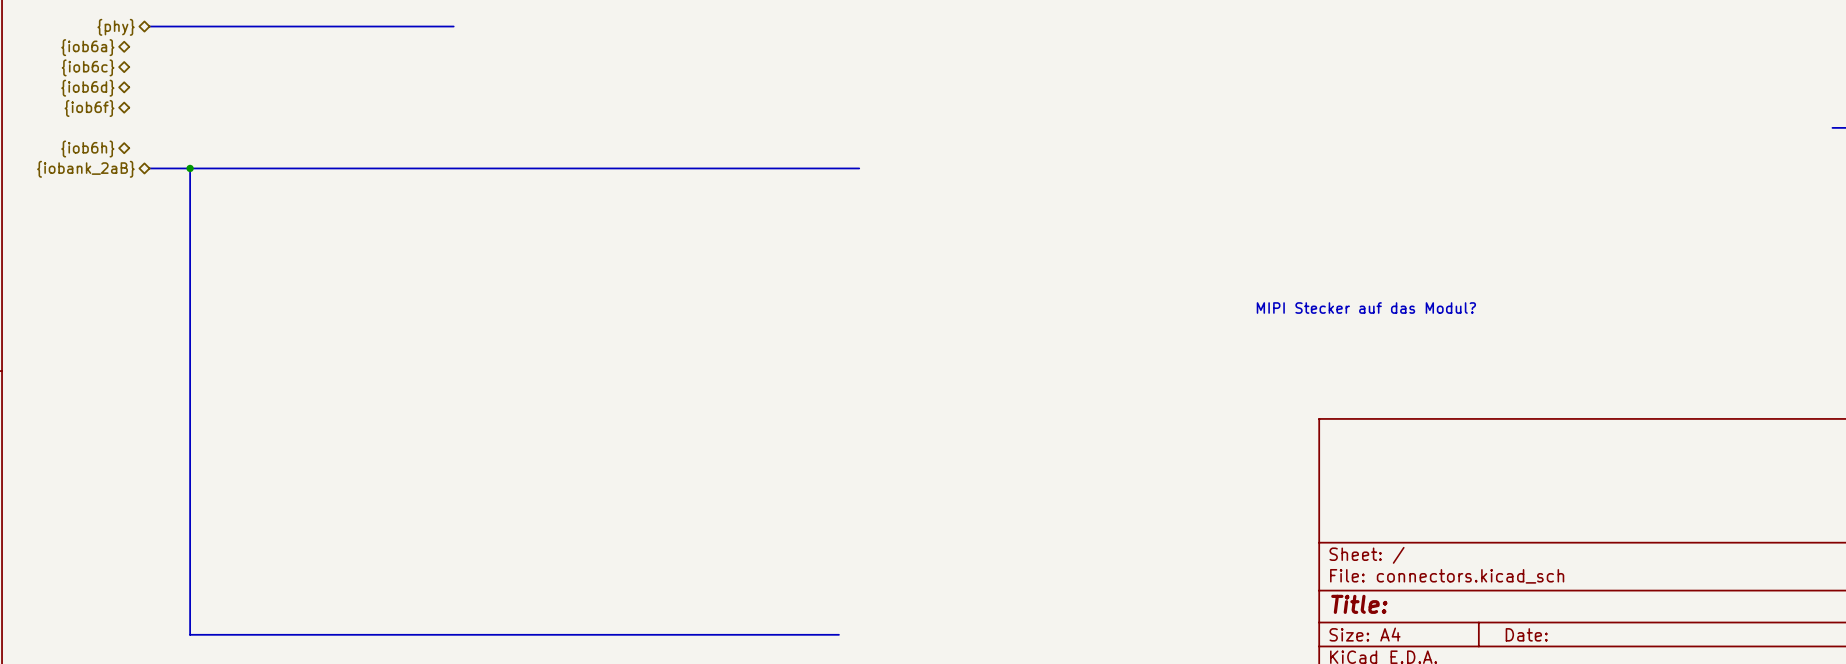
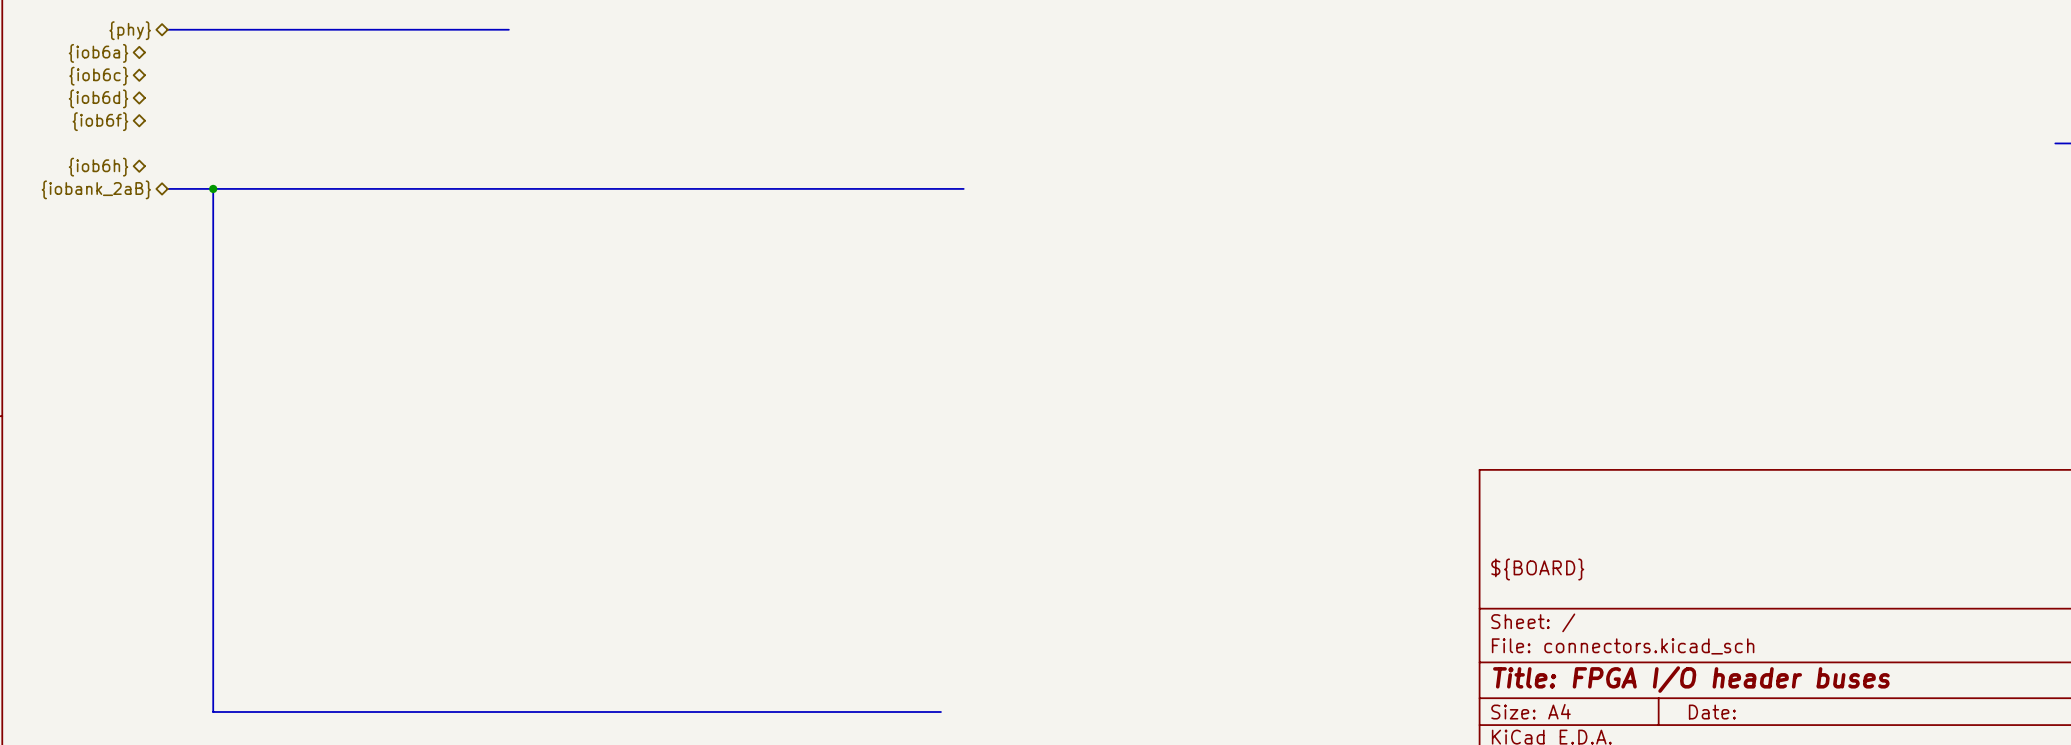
text: MIPI Stecker auf das Modul? (1366, 308) -> none
title block: none -> ${BOARD} (1537, 569)
title block: Title: (1359, 604) -> Title: FPGA I/O header buses (1691, 679)

